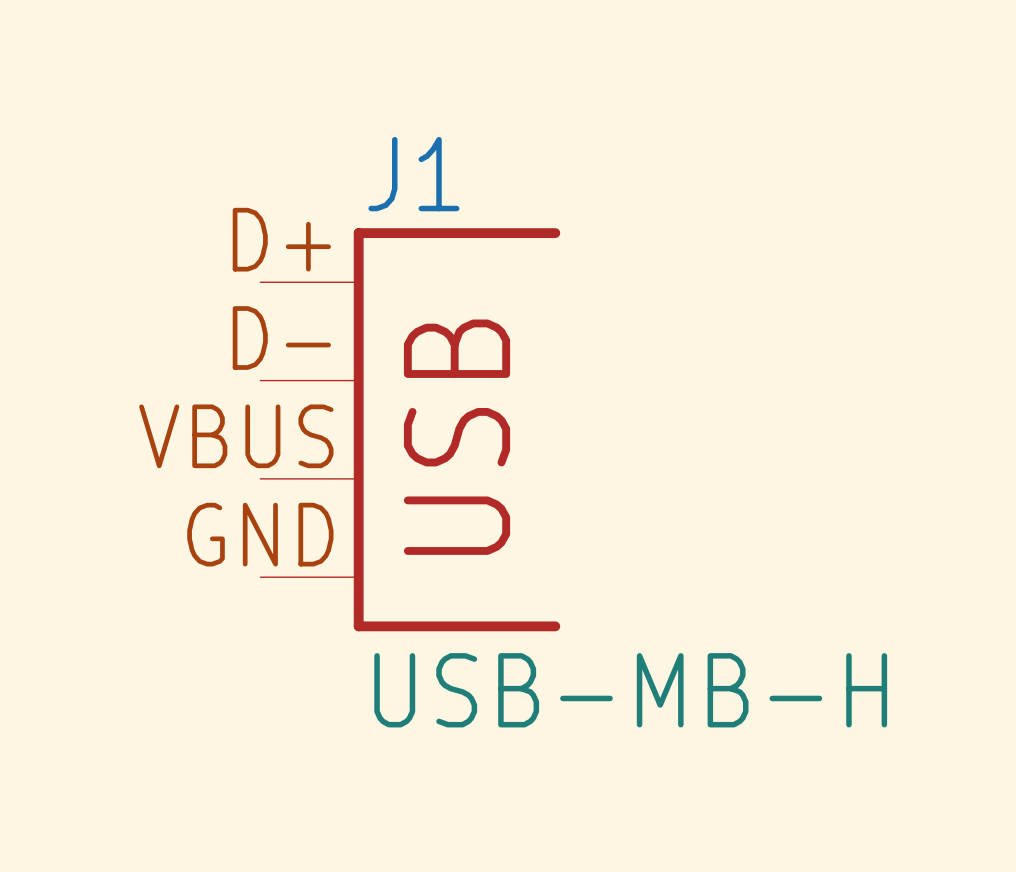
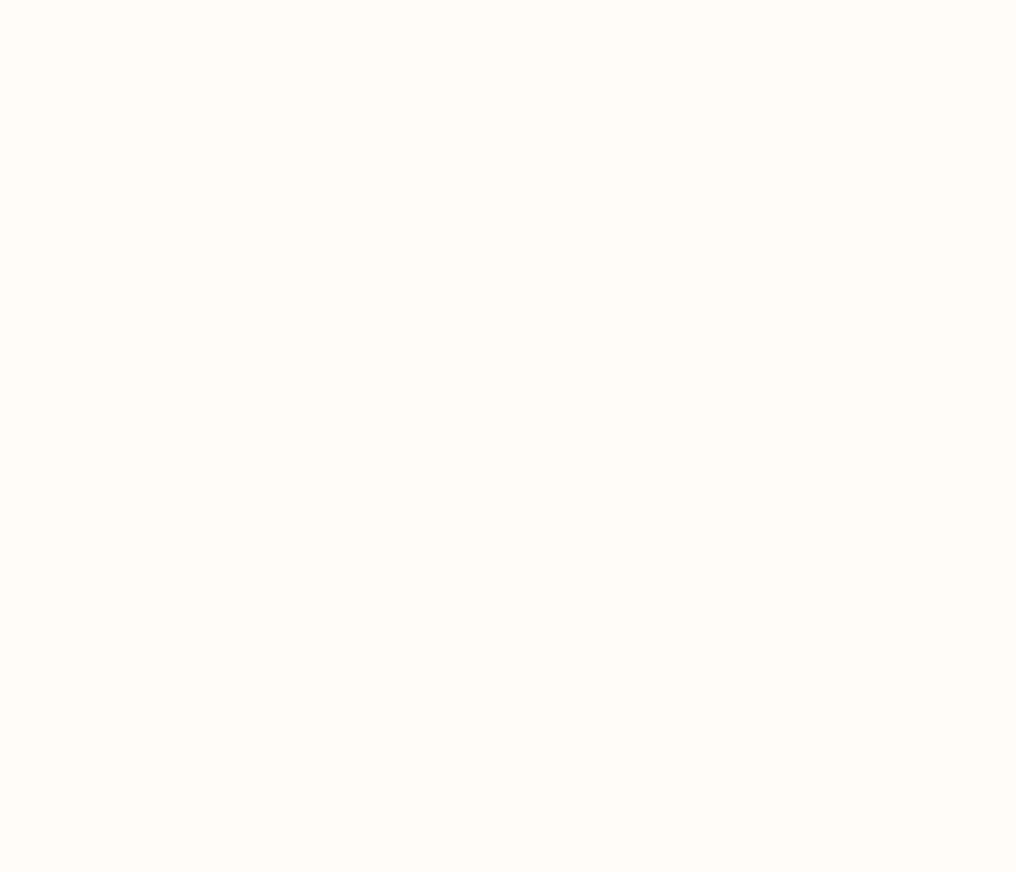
J1: USB-MB-H (410, 429) -> none

